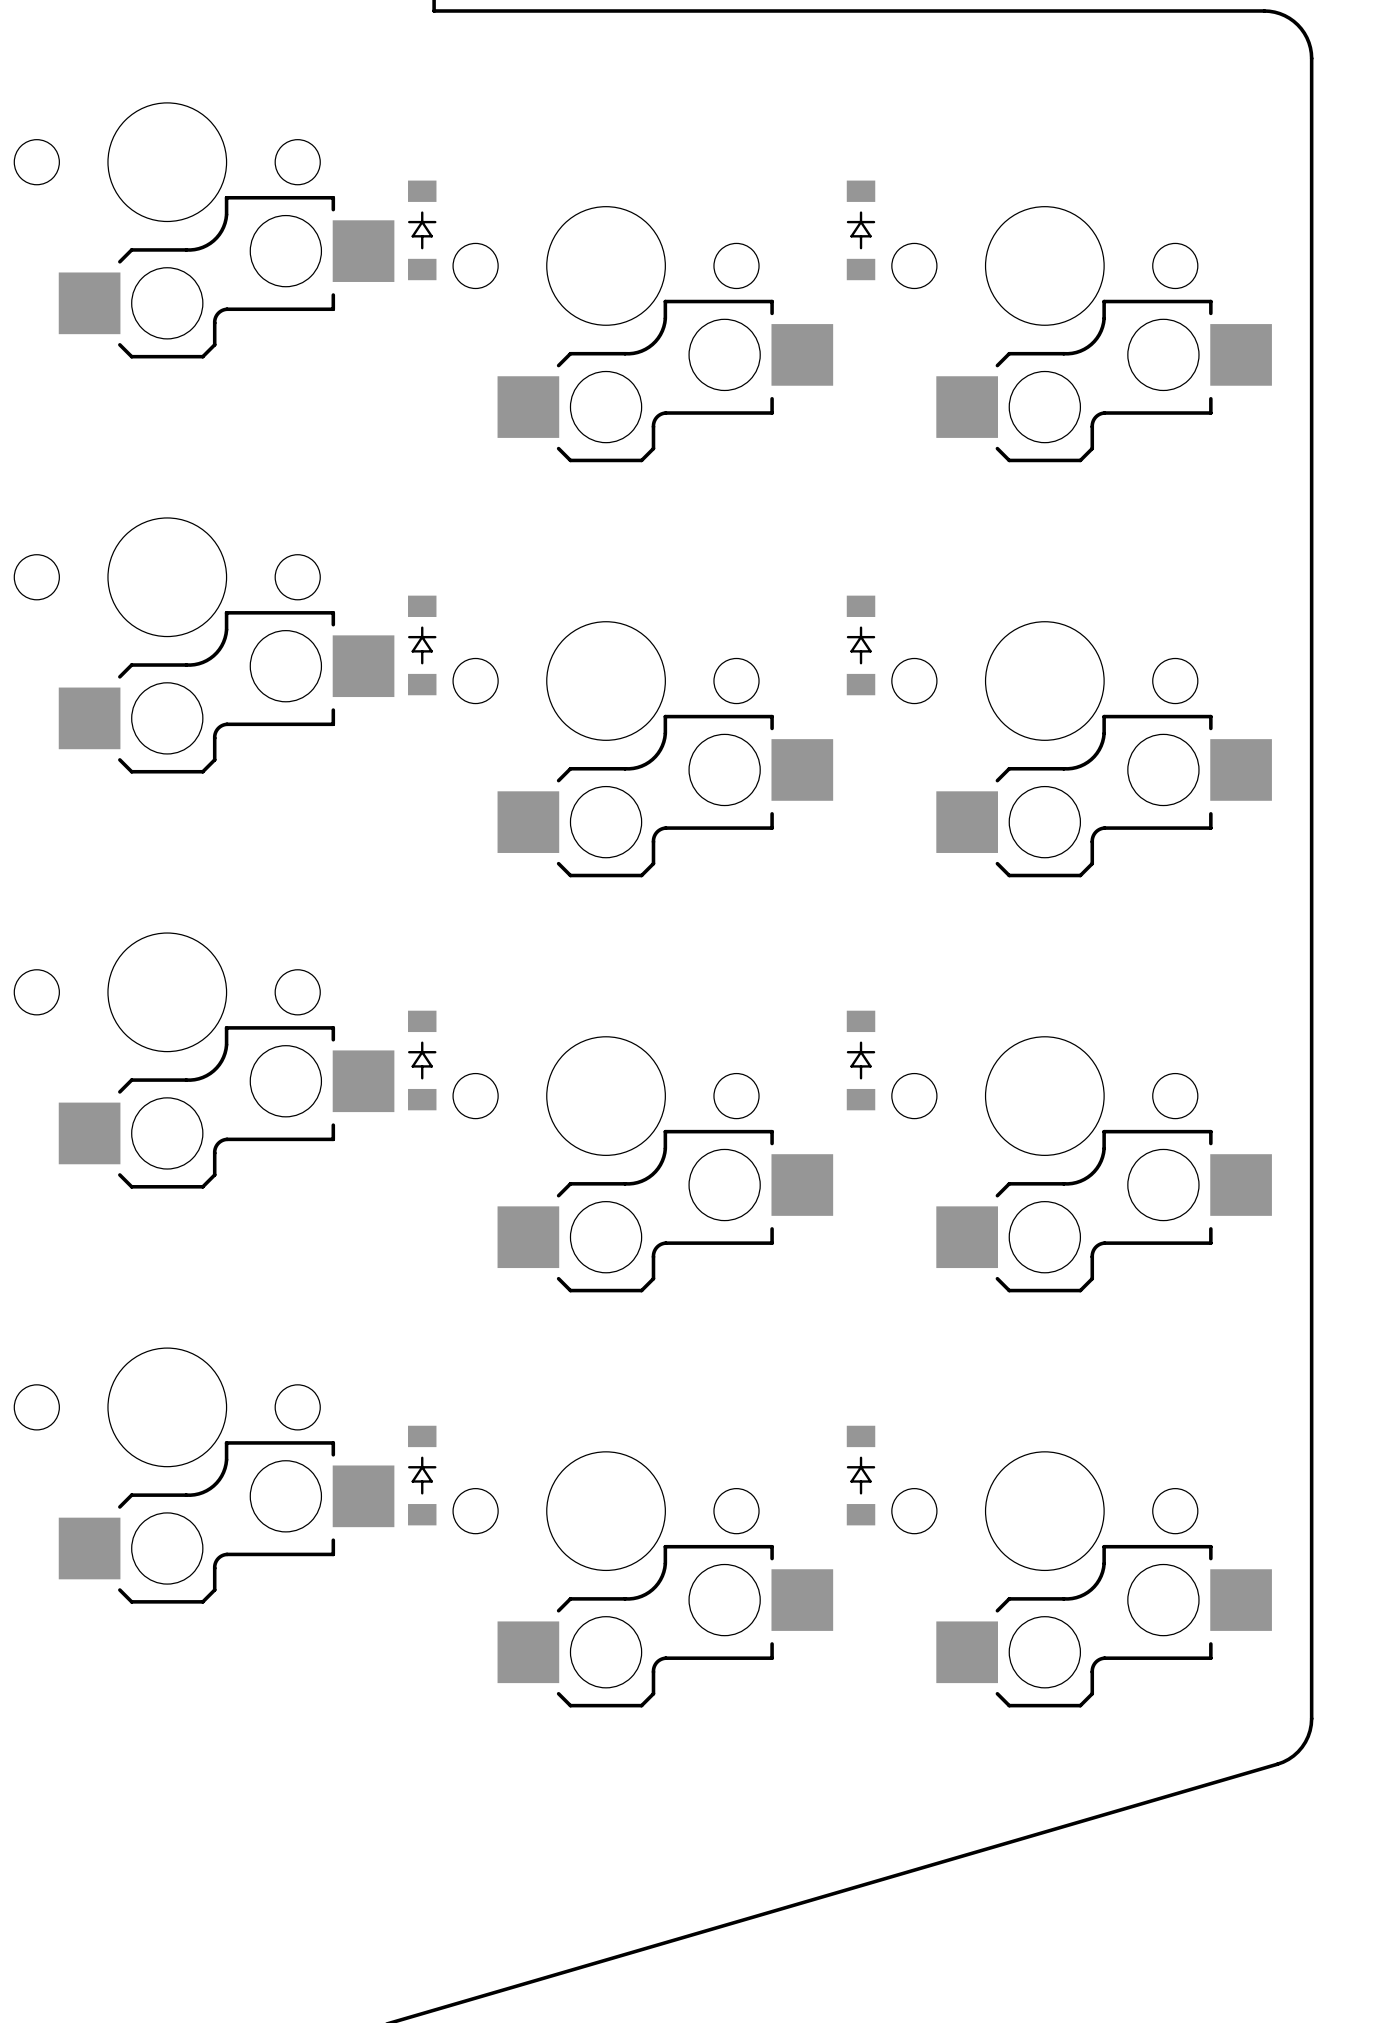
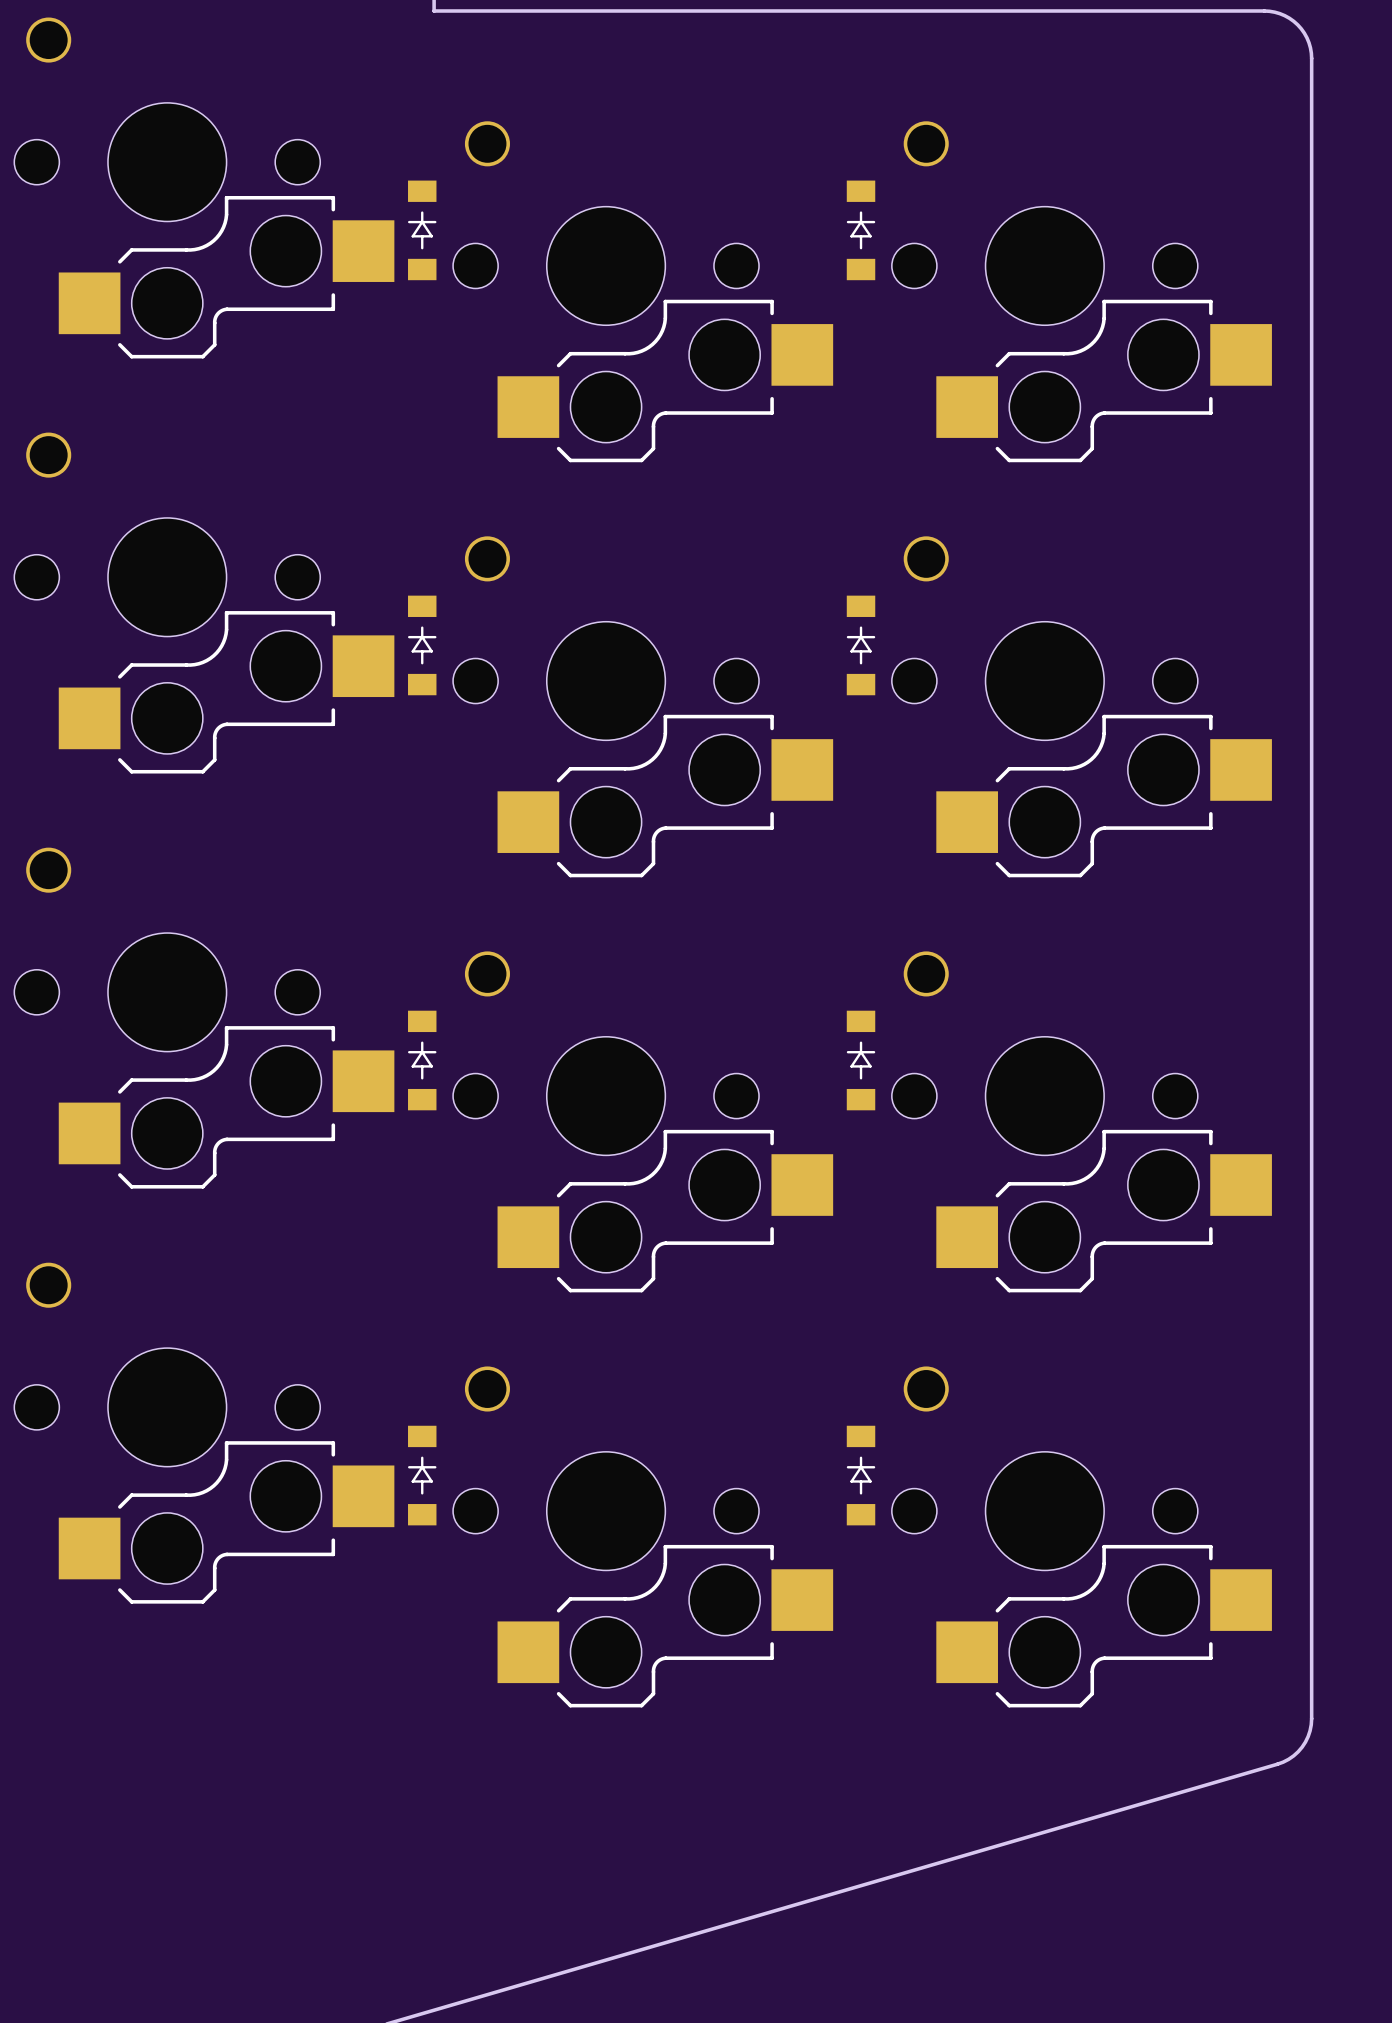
part: none -> (204, 187)
part: none -> (643, 291)
part: none -> (1081, 291)
part: none -> (204, 603)
part: none -> (643, 706)
part: none -> (1081, 706)
part: none -> (204, 1018)
part: none -> (643, 1121)
part: none -> (1081, 1121)
part: none -> (204, 1433)
part: none -> (643, 1536)
part: none -> (1081, 1536)

